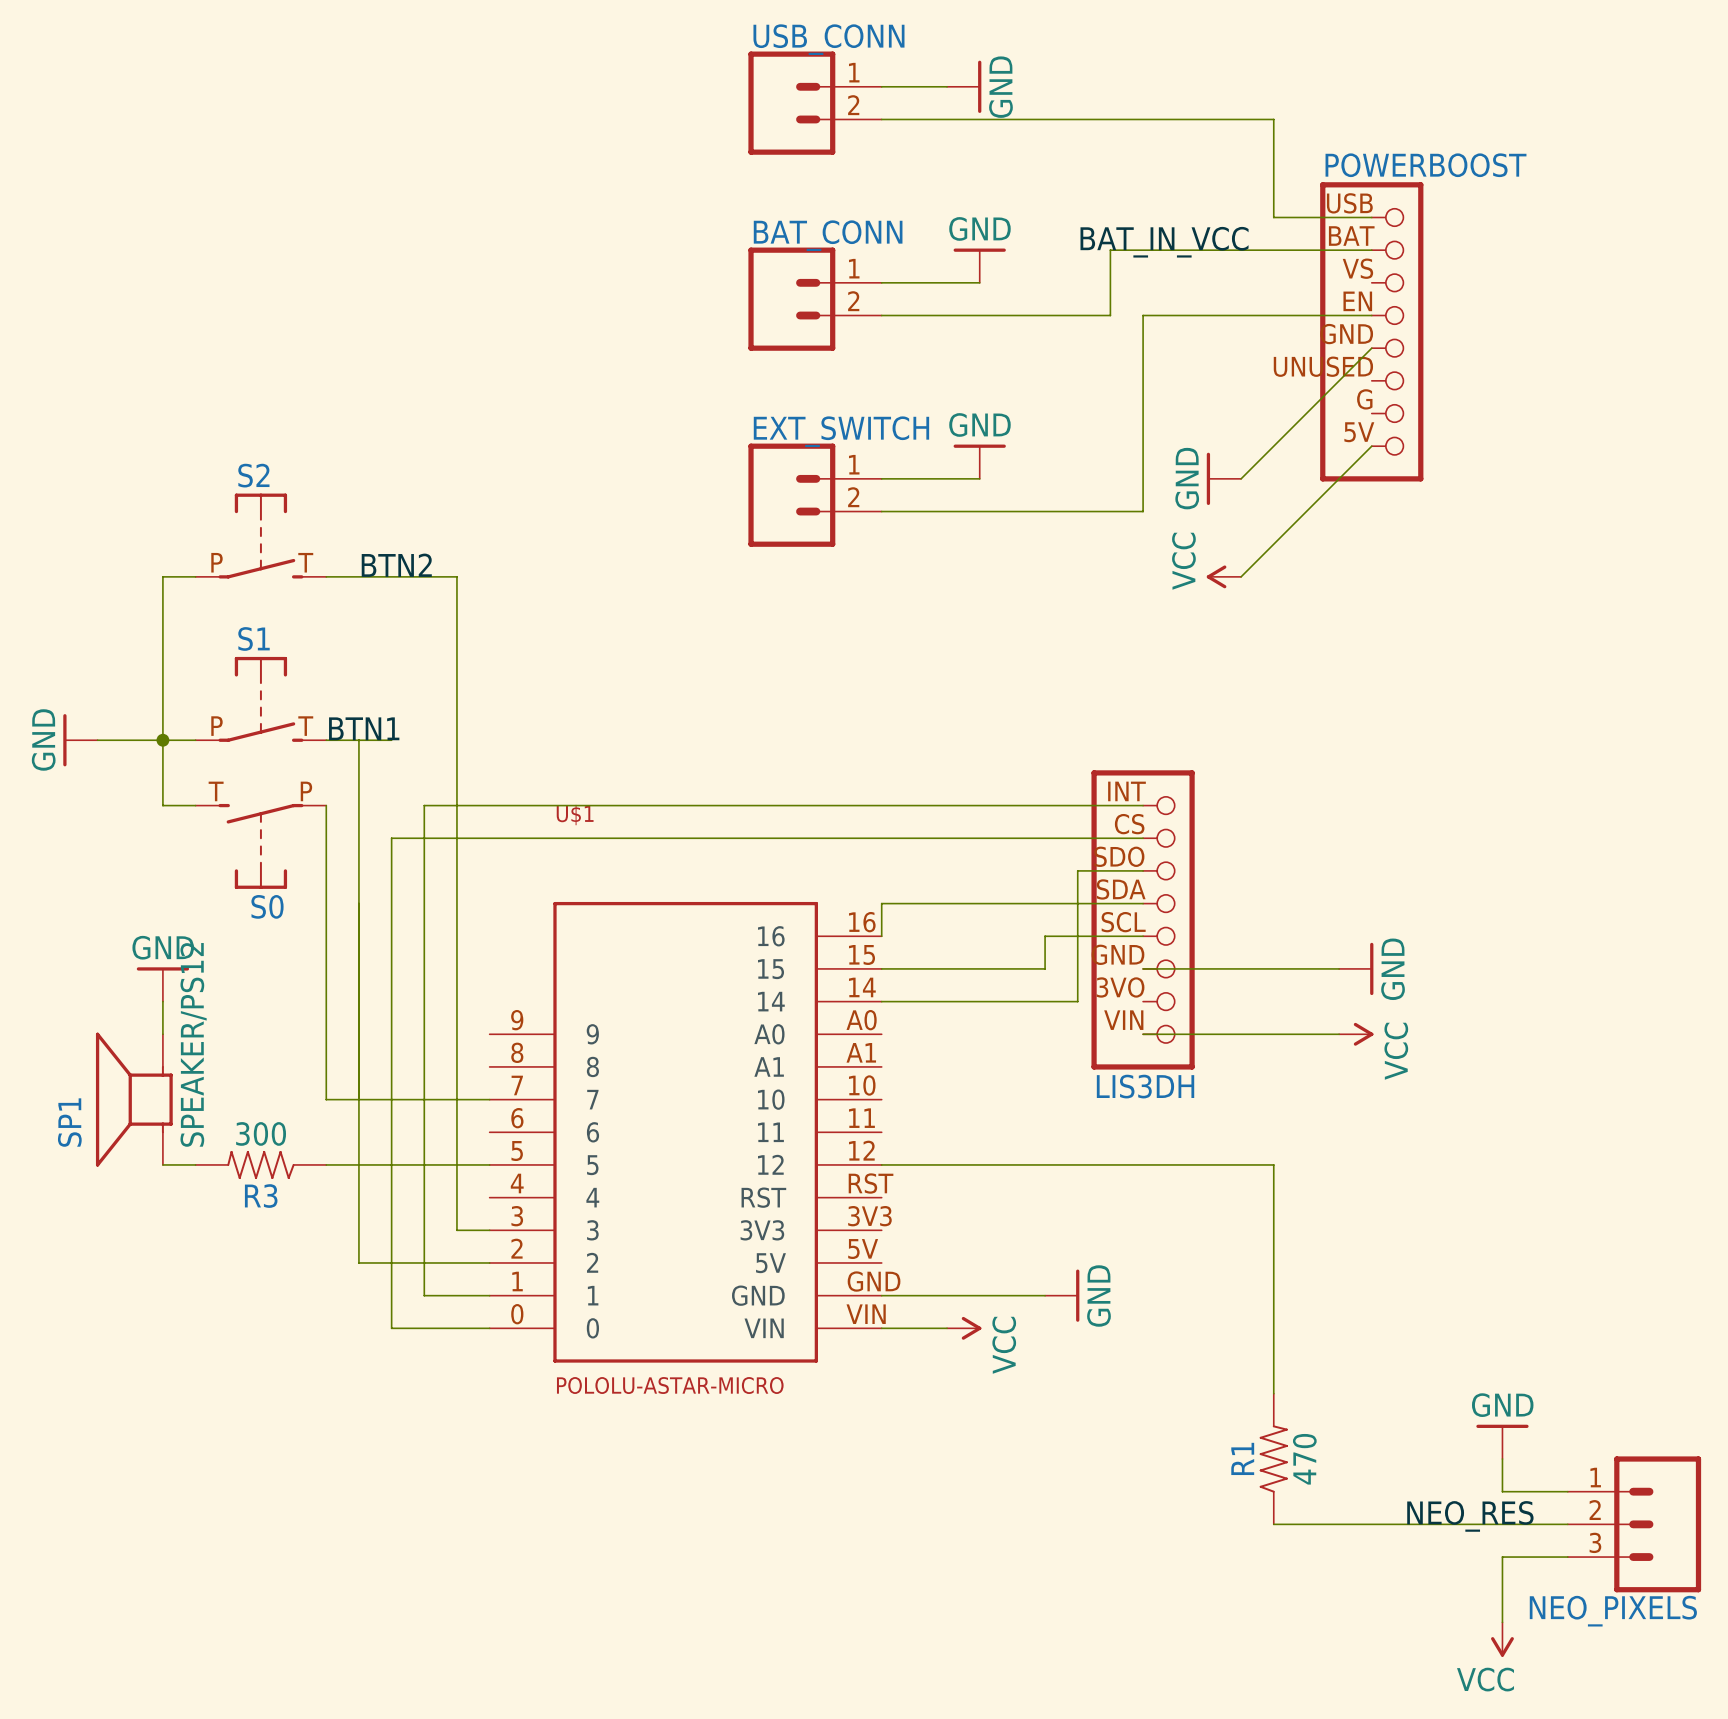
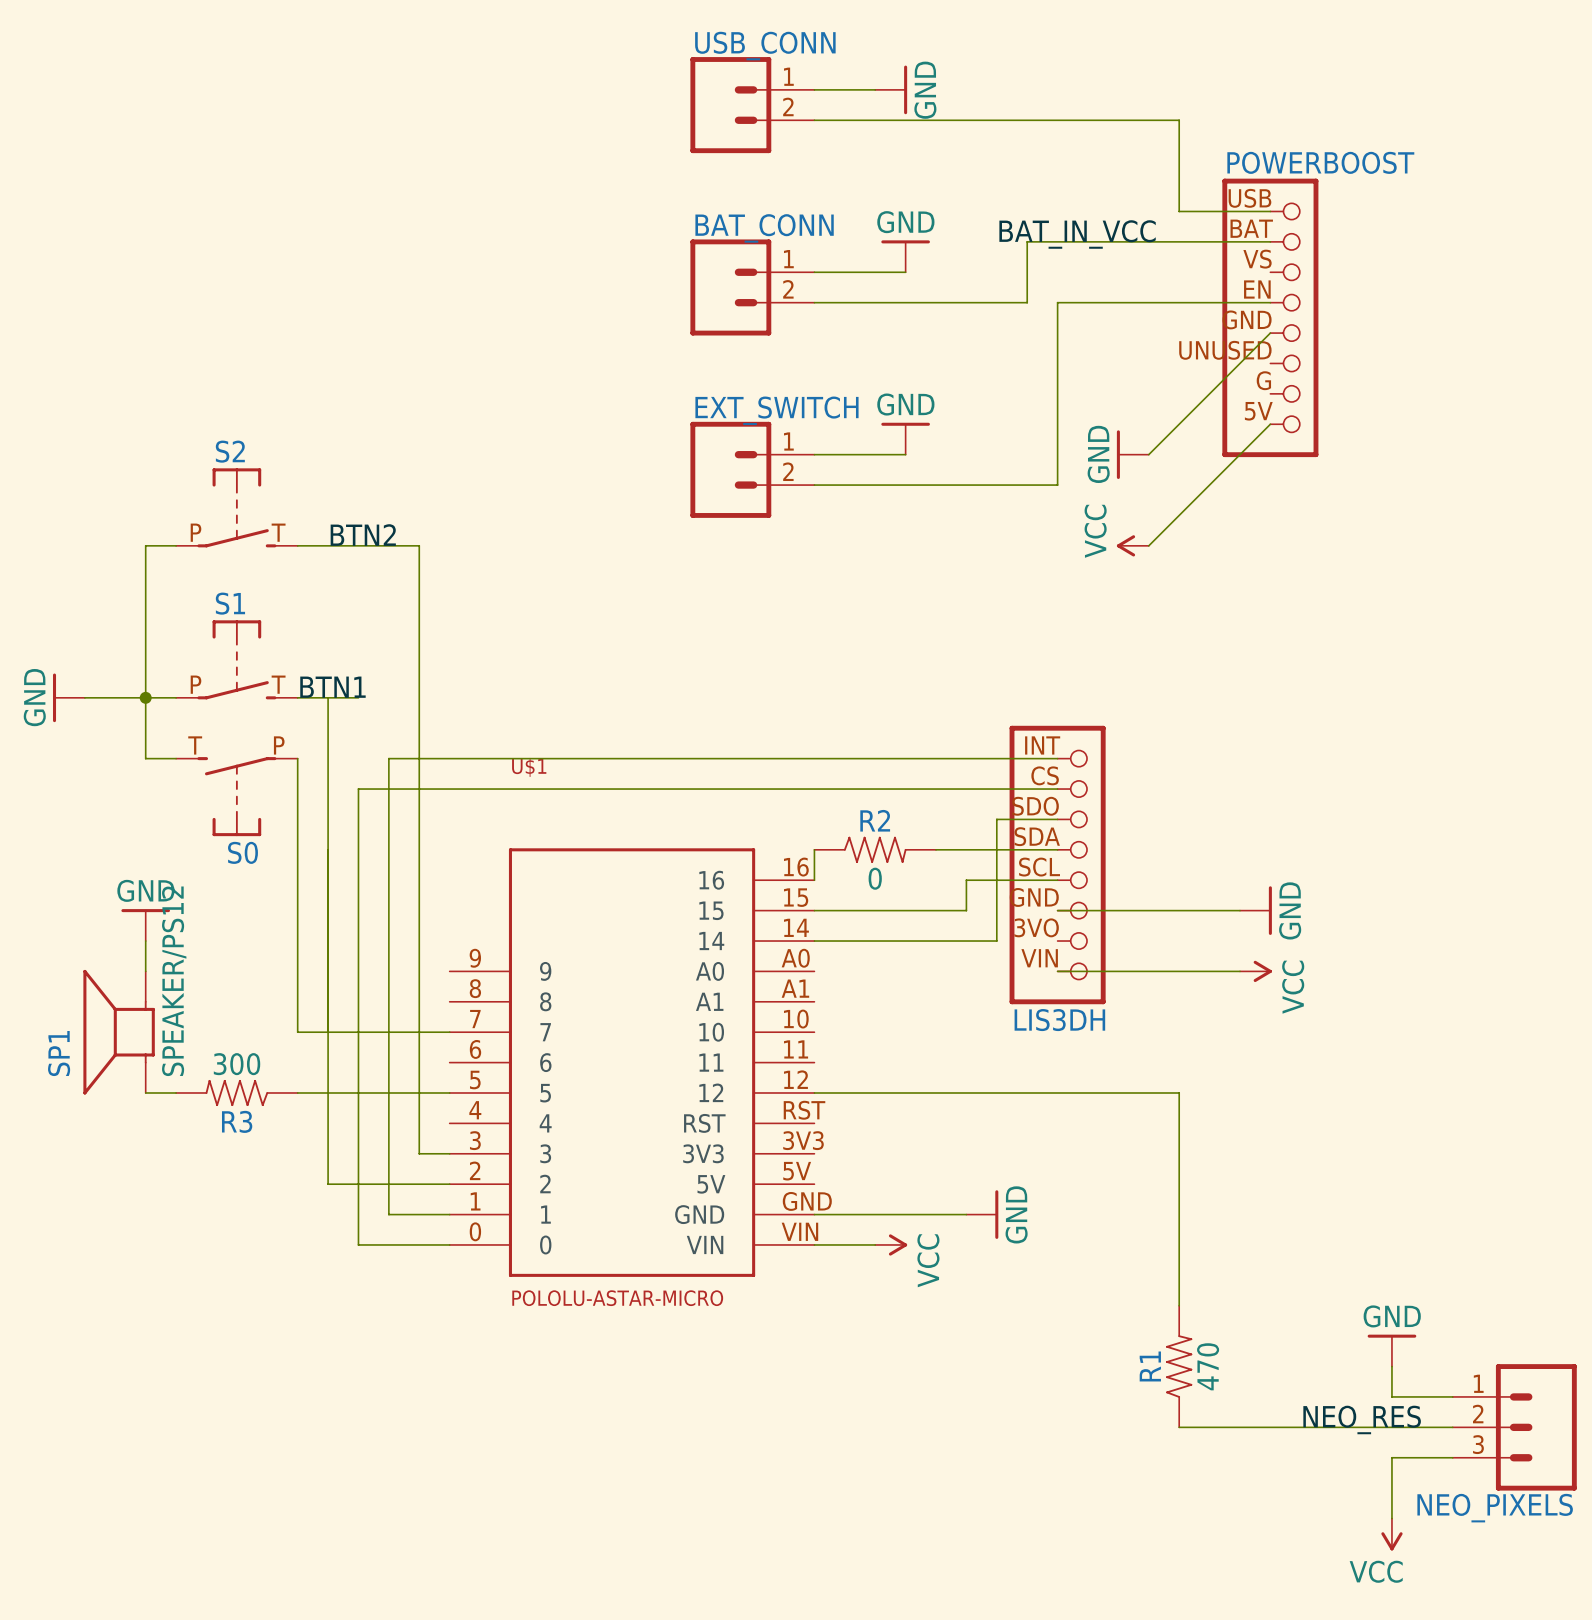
R2: none -> 0 (875, 849)

